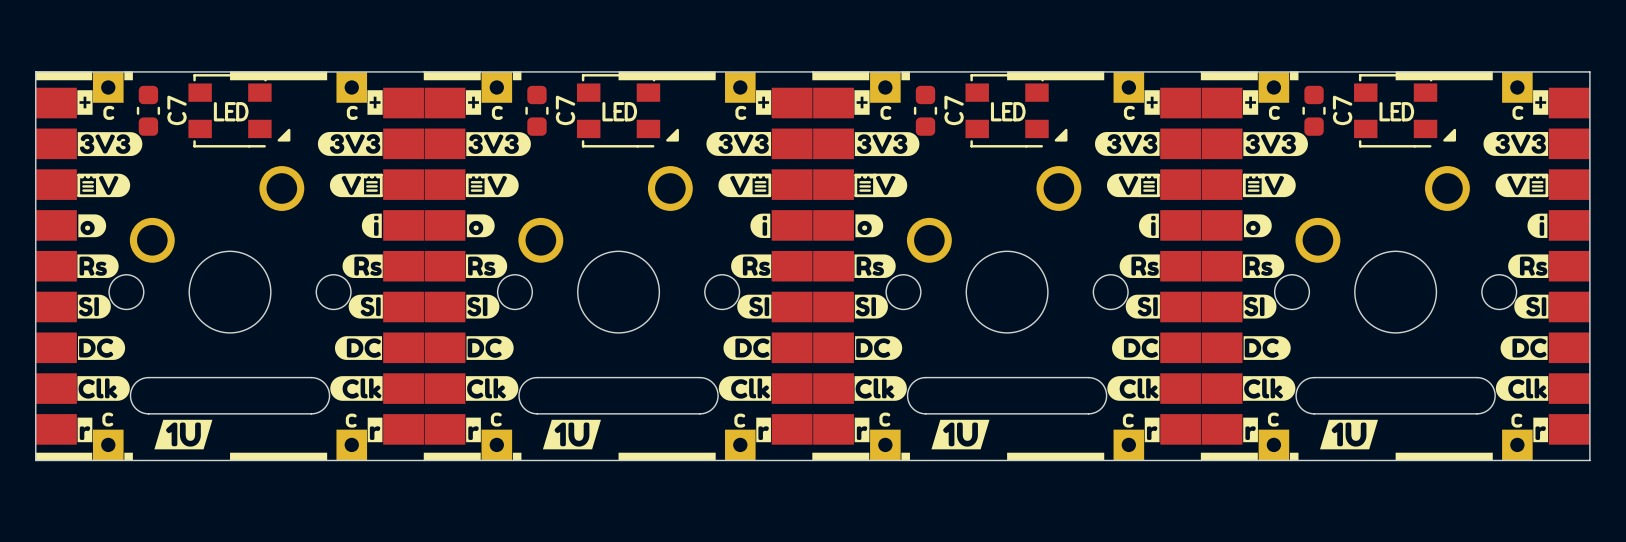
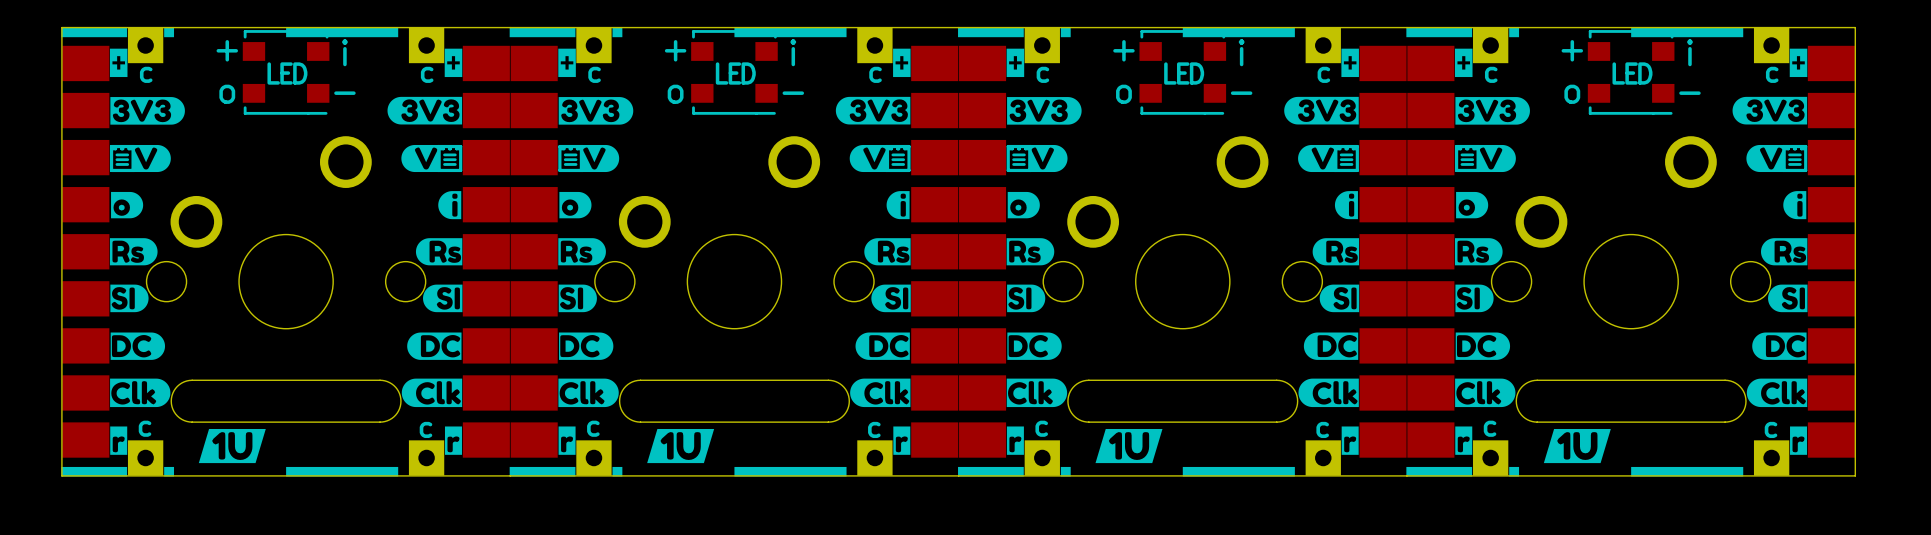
part footprint: [188, 74, 291, 148] -> [242, 30, 330, 115]
part footprint: [576, 74, 679, 148] -> [691, 30, 778, 115]
part footprint: [965, 74, 1068, 148] -> [1139, 30, 1227, 115]
part footprint: [1354, 74, 1457, 148] -> [1587, 30, 1675, 115]
C7: (148, 110) -> none
C7: (536, 110) -> none
C7: (925, 110) -> none
C7: (1314, 110) -> none

